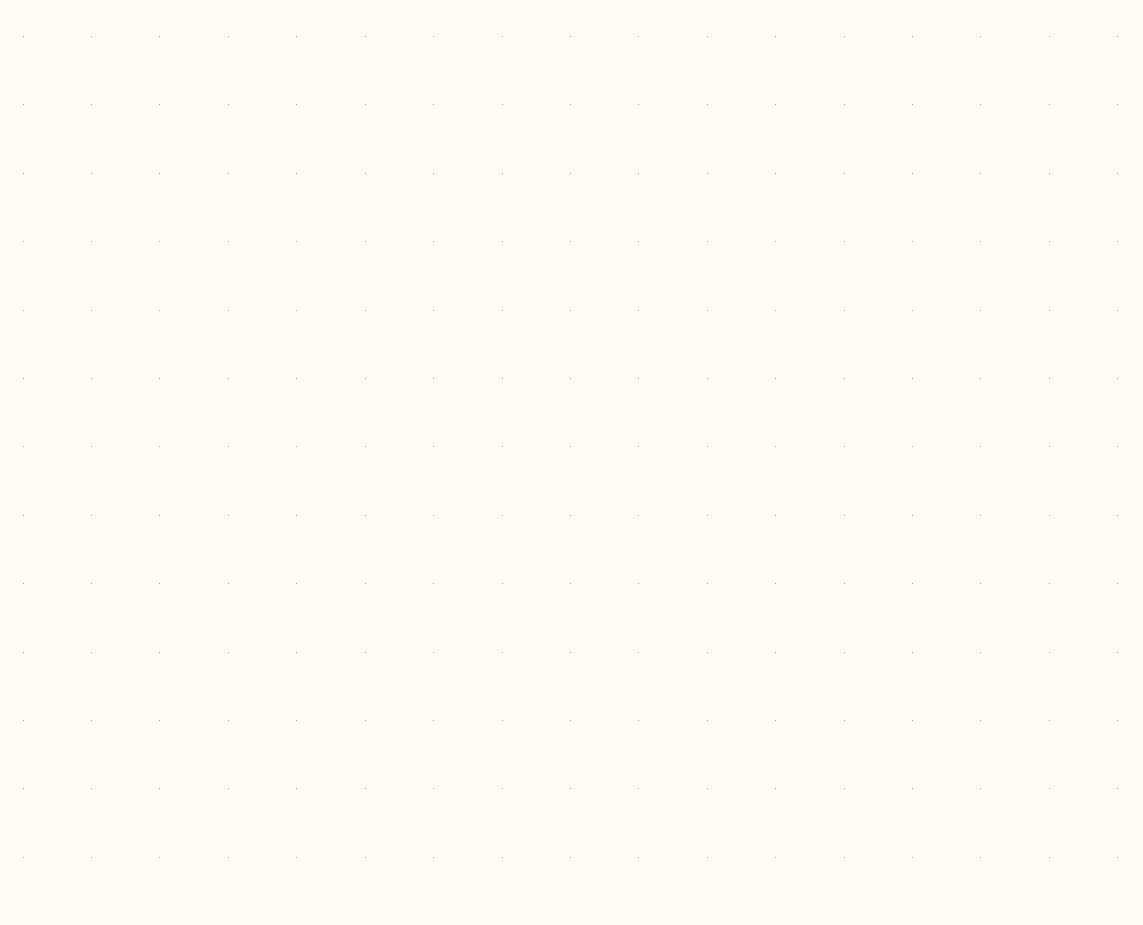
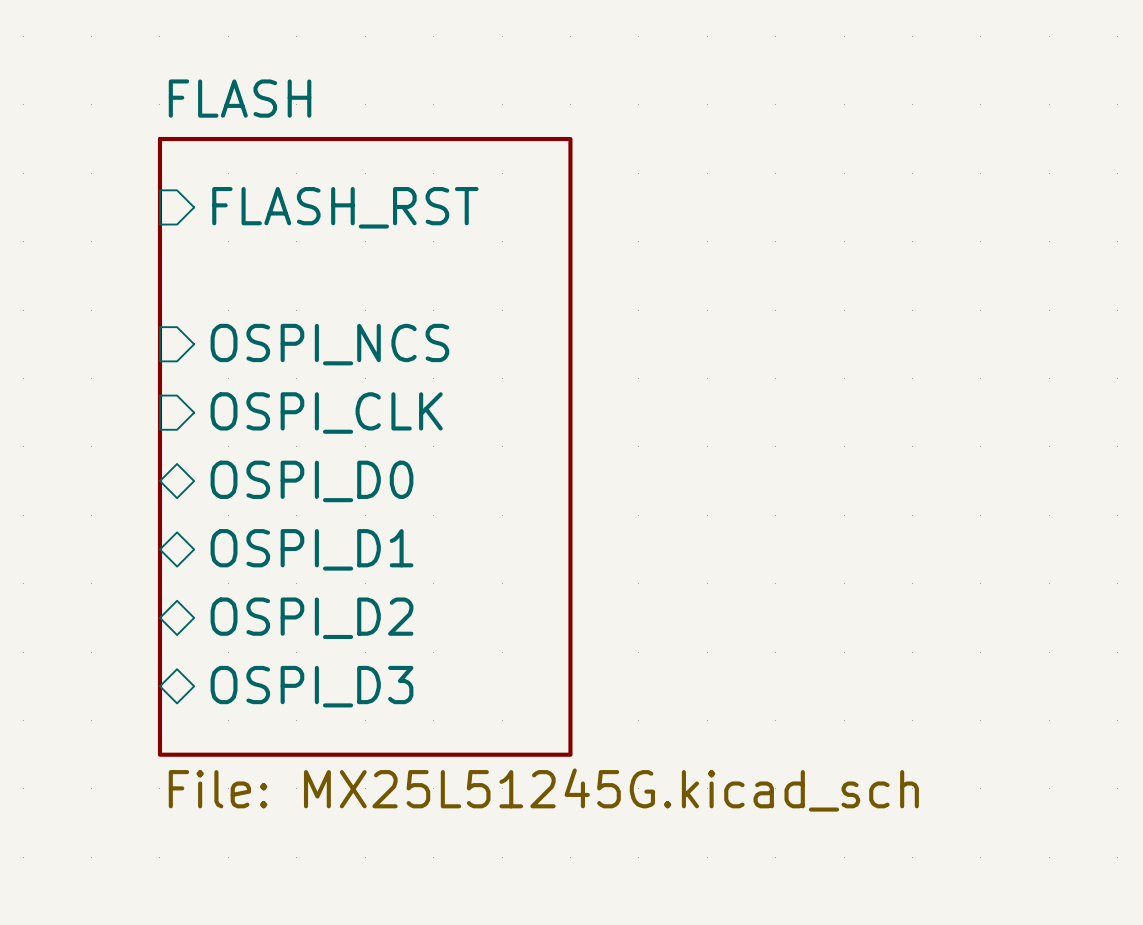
sheet pin: none -> FLASH_RST (345, 207)
sheet pin: none -> OSPI_NCS (329, 344)
sheet pin: none -> OSPI_CLK (326, 413)
sheet FLASH: none -> File: MX25L51245G.kicad_sch (365, 446)
sheet pin: none -> OSPI_D0 (311, 481)
sheet pin: none -> OSPI_D1 (311, 549)
sheet pin: none -> OSPI_D2 (311, 618)
sheet pin: none -> OSPI_D3 (311, 686)

